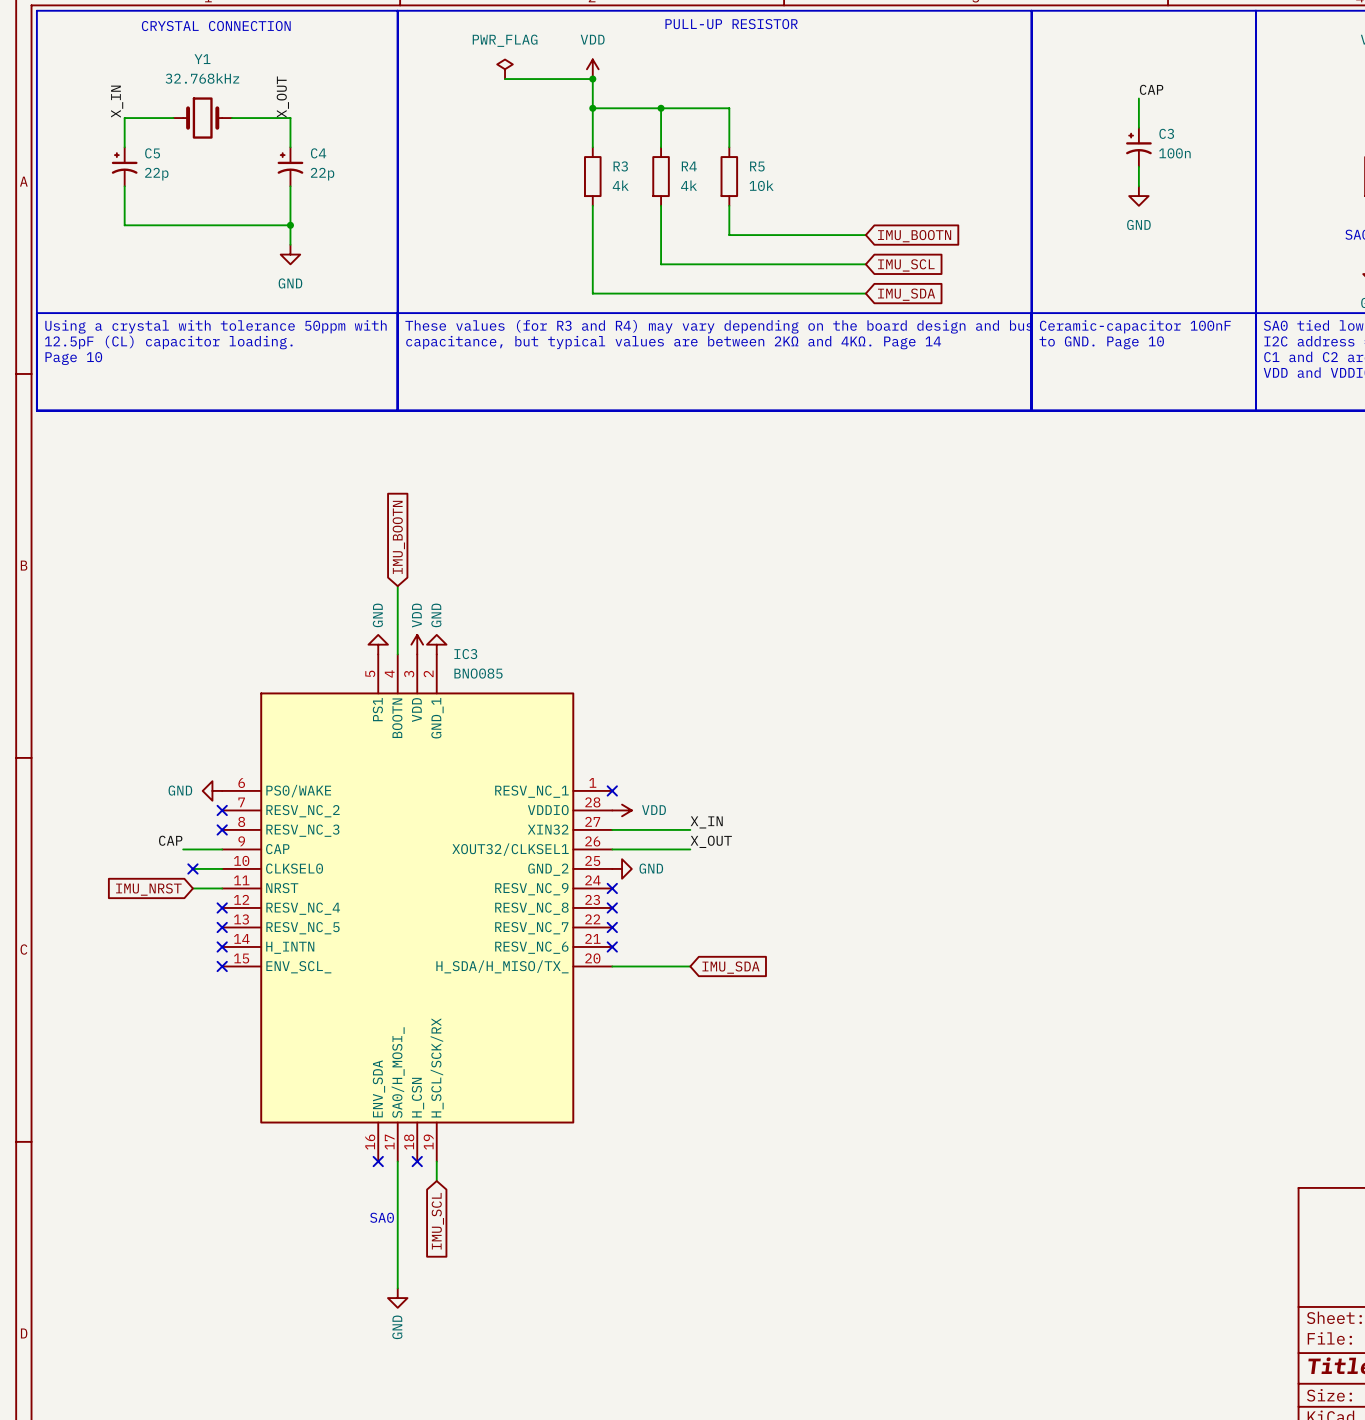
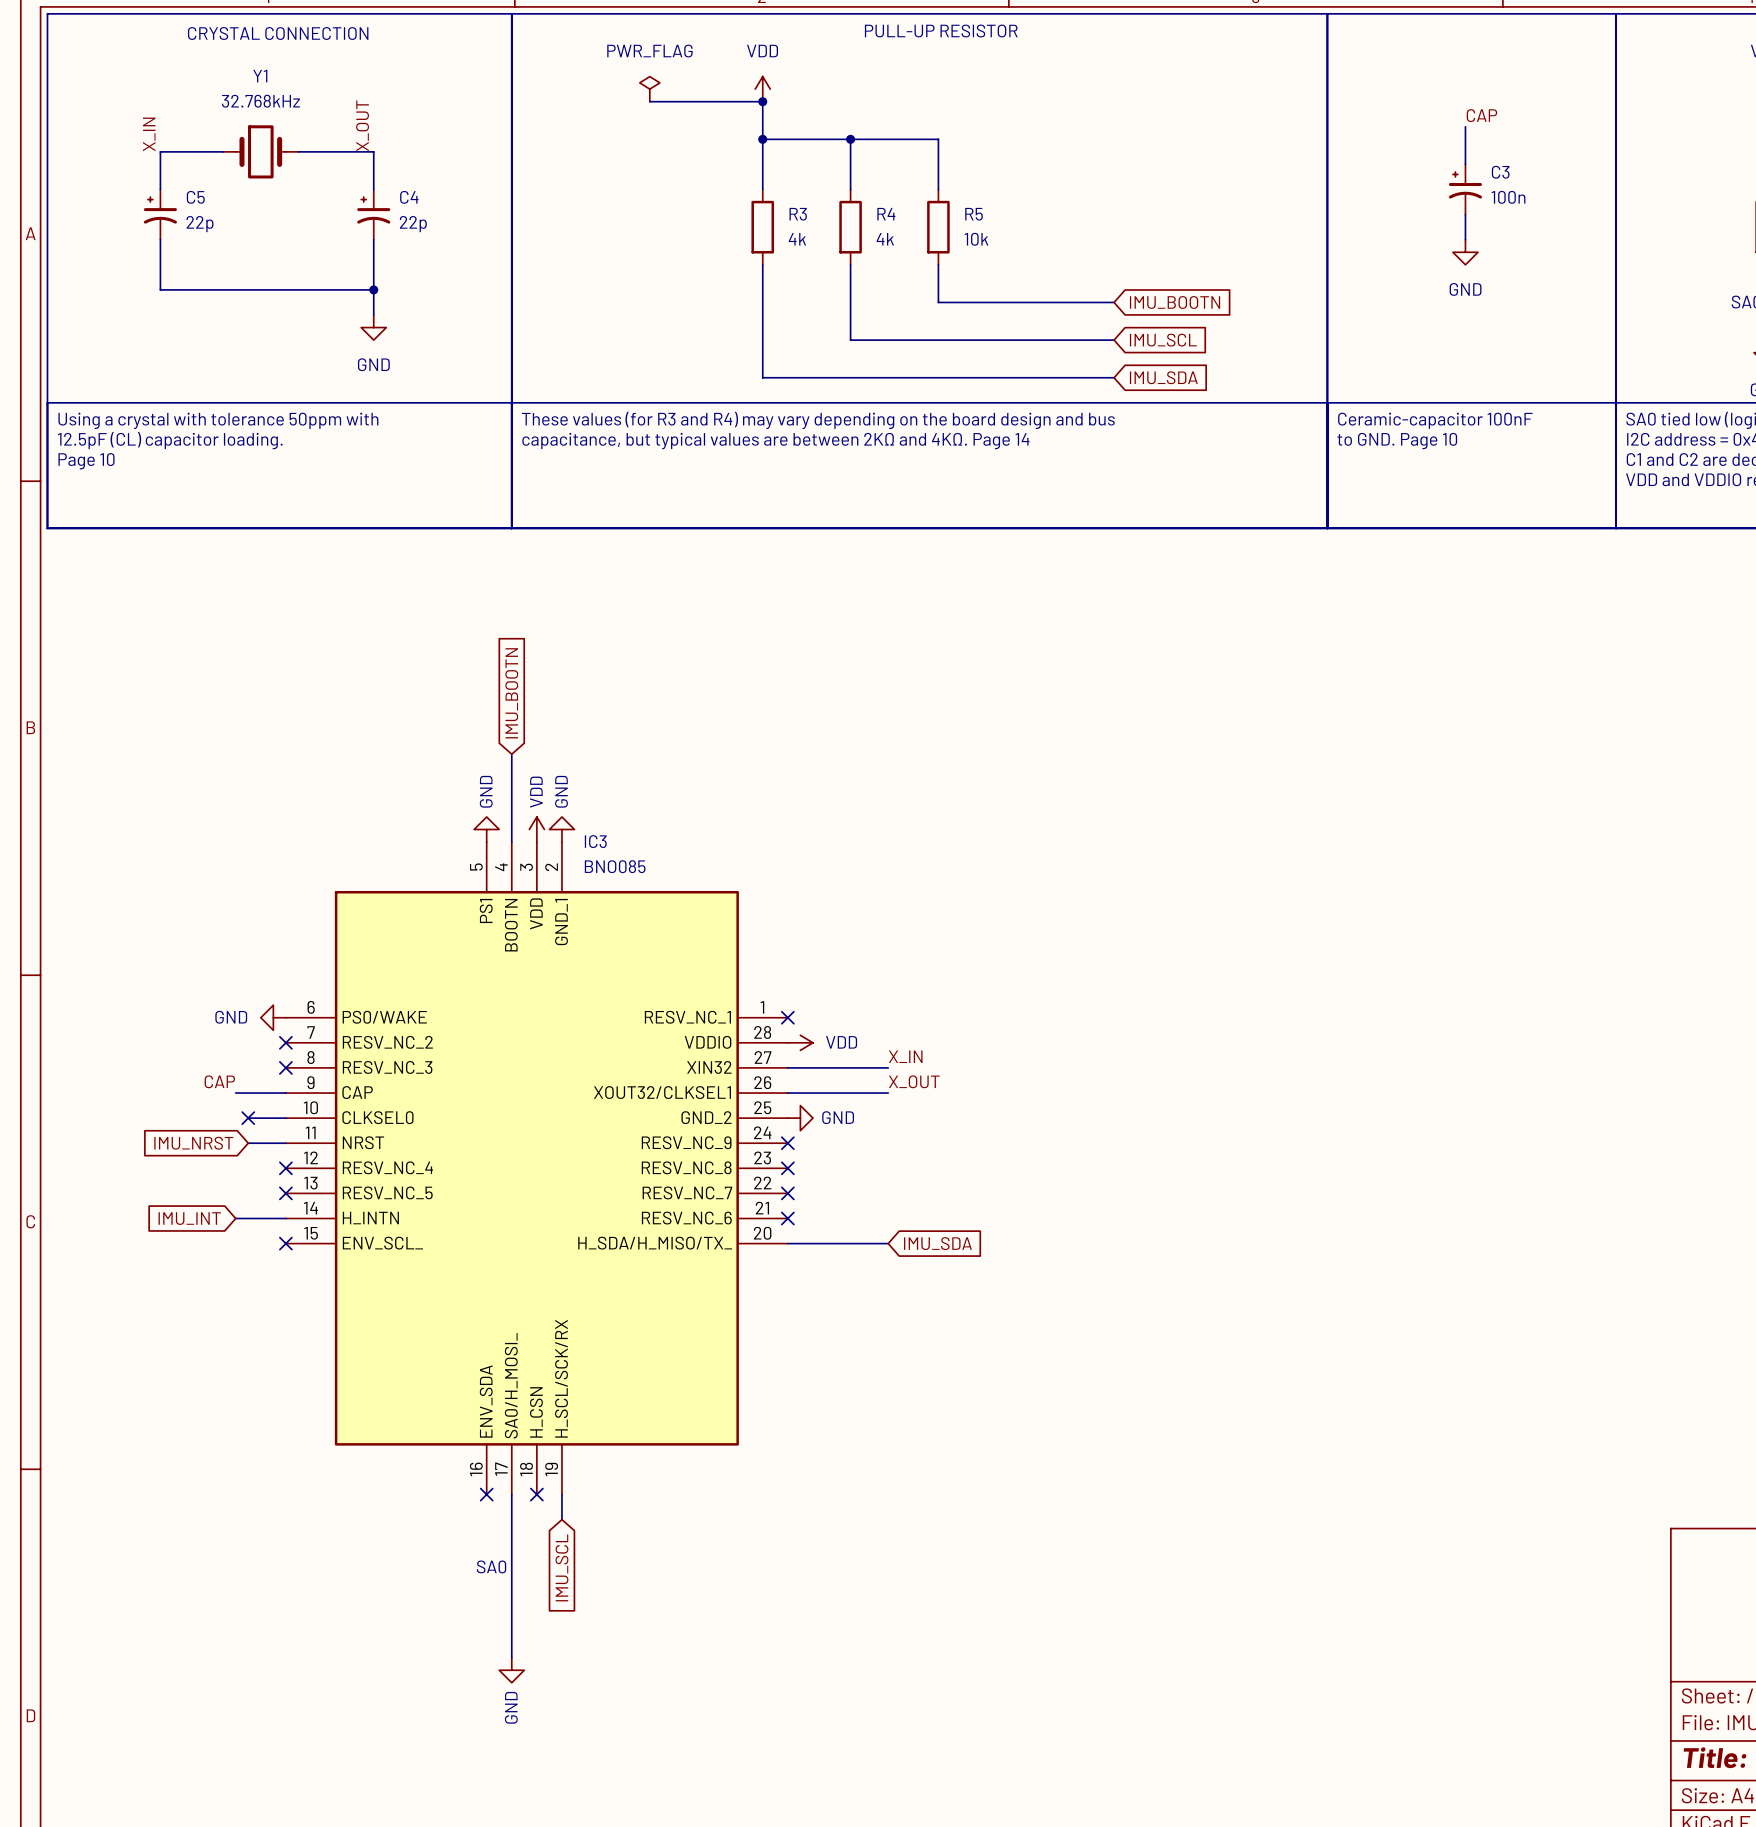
wire: none -> (235, 1218) (285, 1218)
no-connect mark: (222, 946) -> none
global label: none -> IMU_INT (189, 1218)

